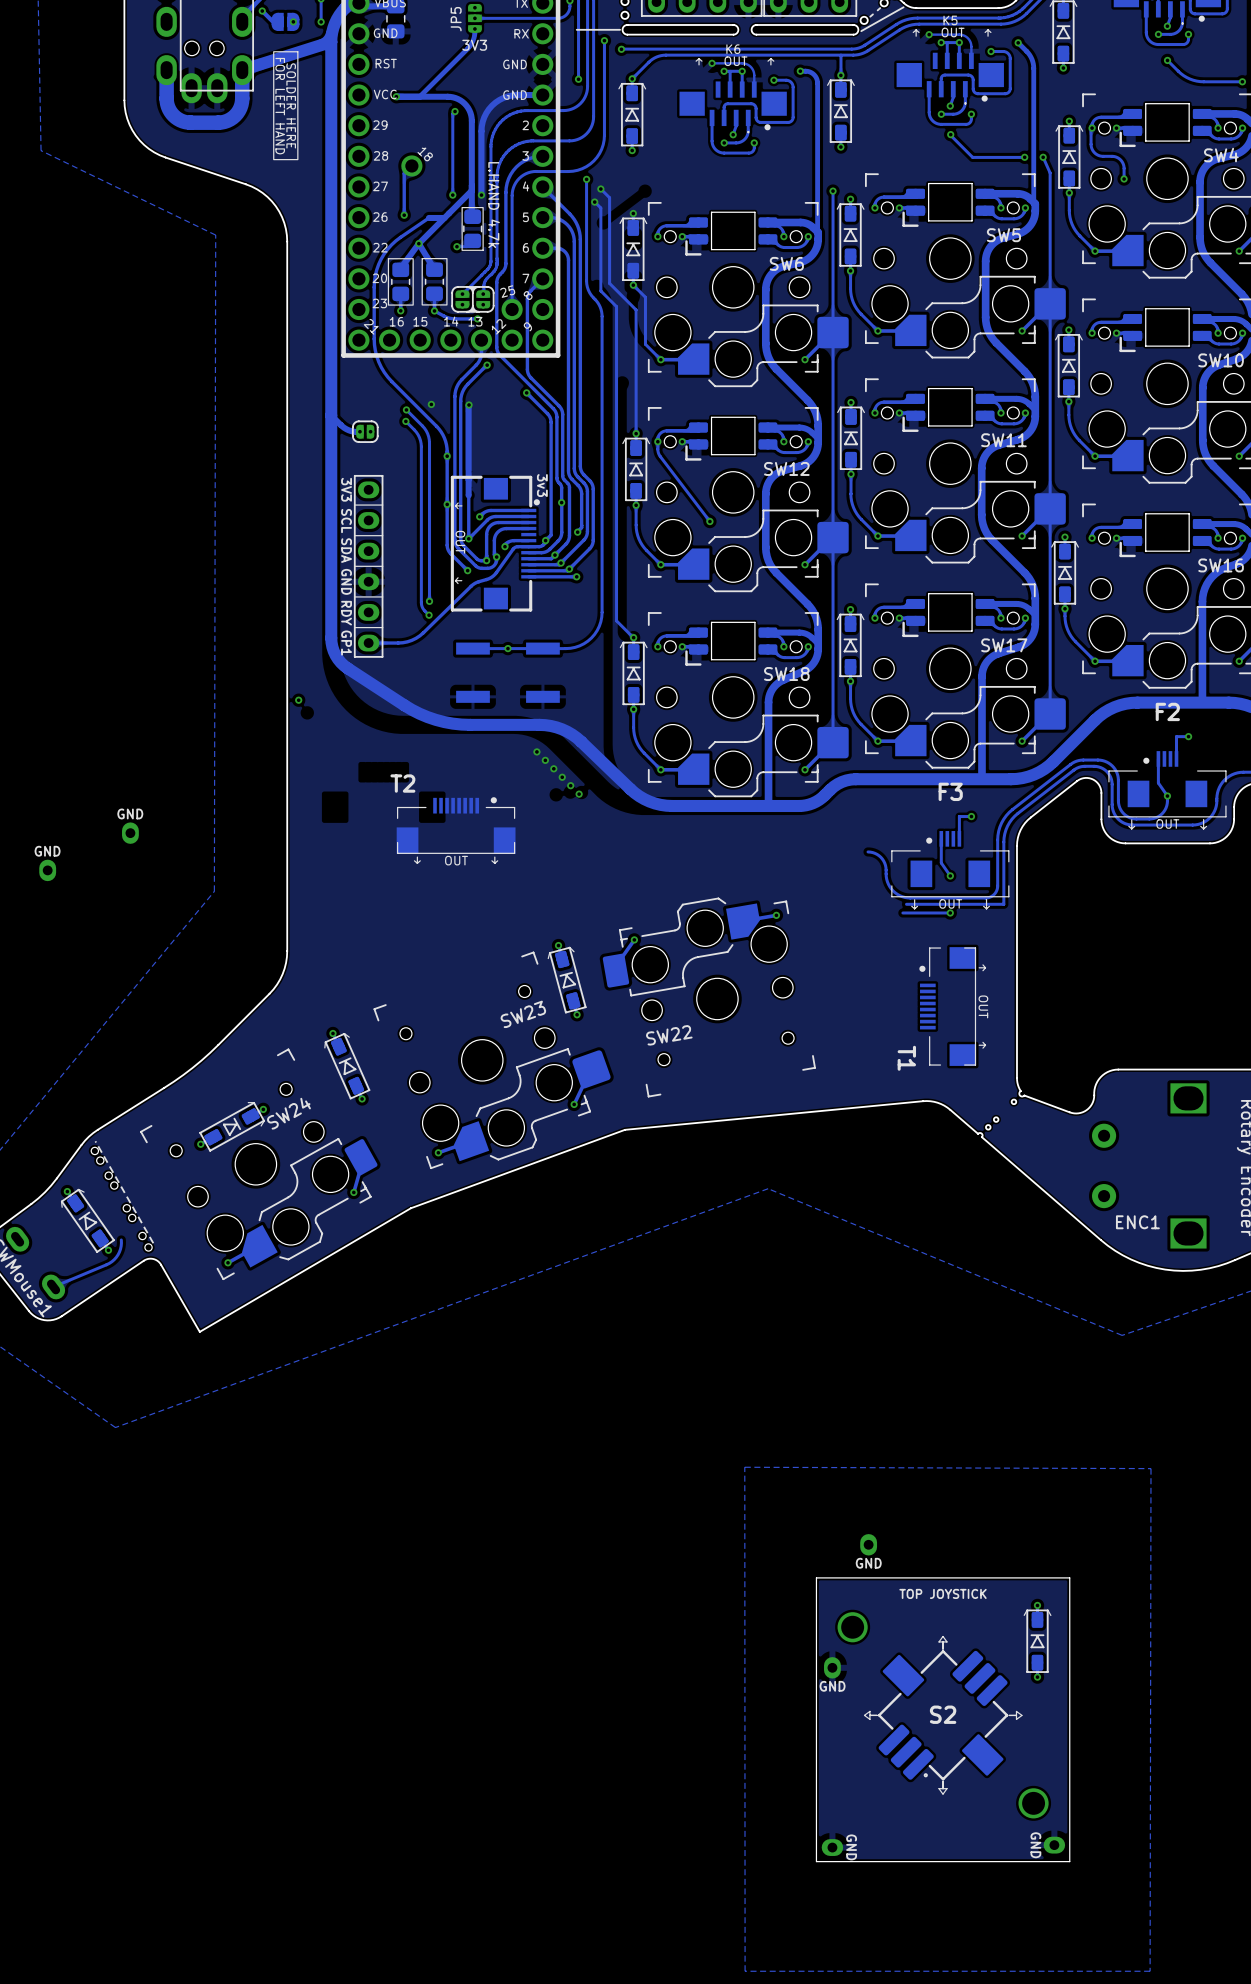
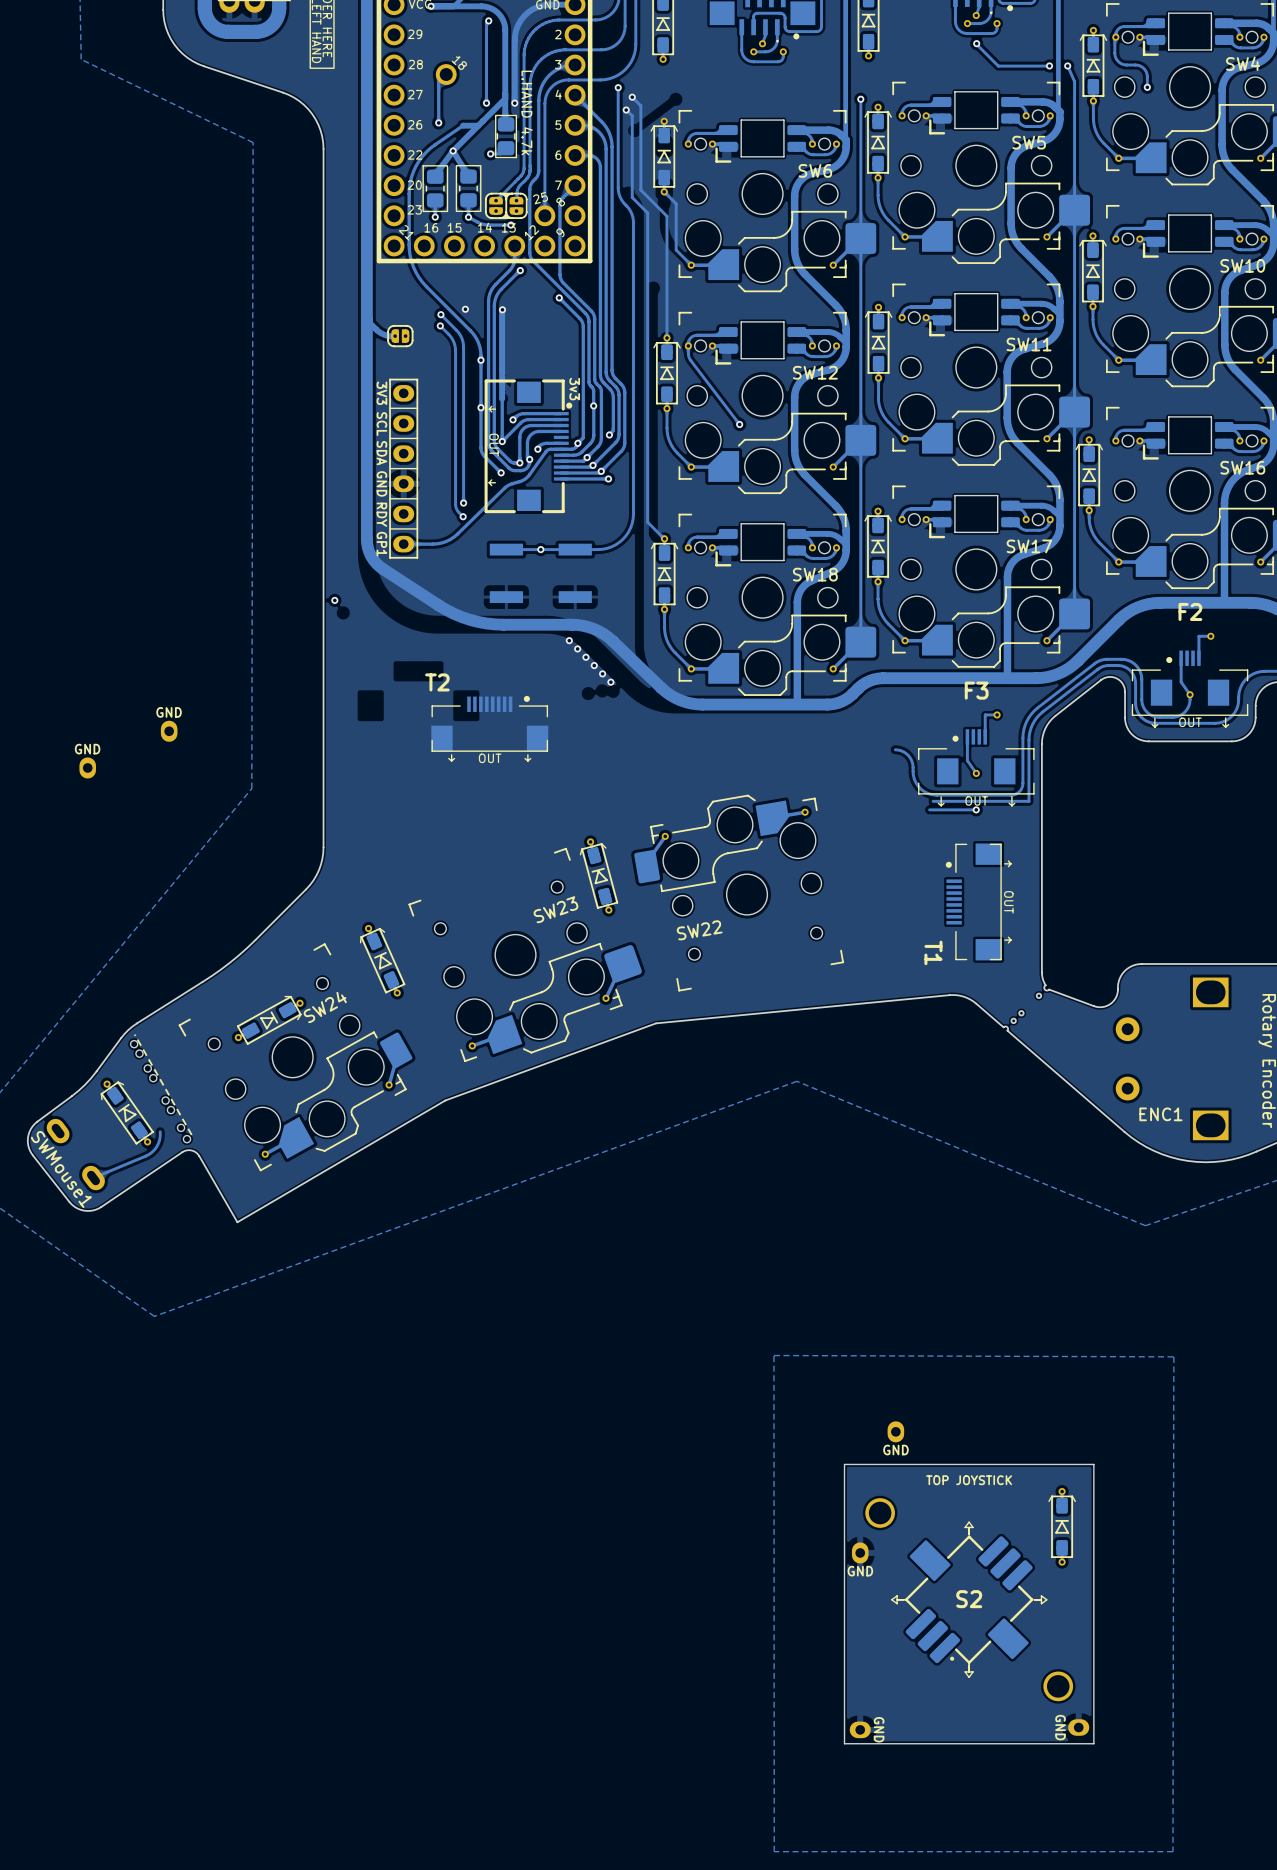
via: none -> (569, 640)
via: none -> (577, 648)
via: (536, 751) -> none
via: none -> (585, 657)
via: (545, 760) -> none
via: none -> (594, 665)
via: (553, 768) -> none
via: none -> (602, 673)
via: (562, 777) -> none
via: none -> (610, 682)
via: (570, 785) -> none
via: (579, 794) -> none

